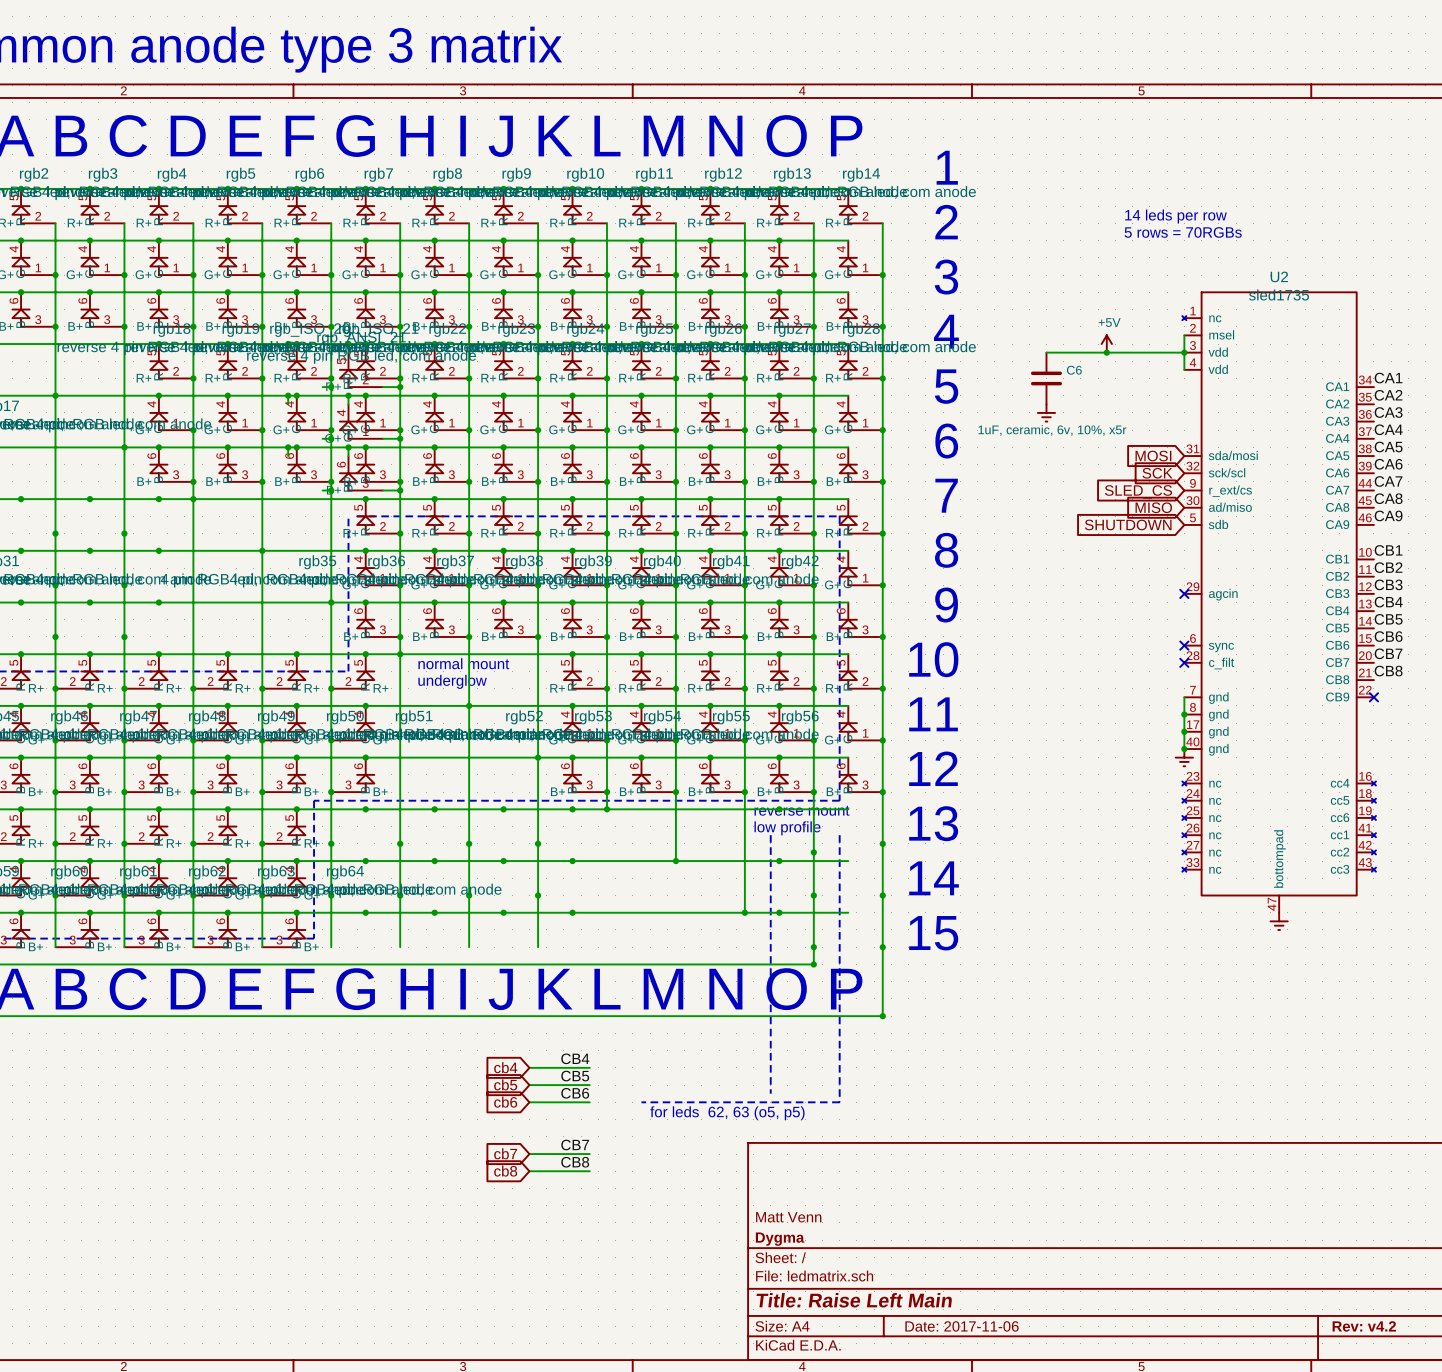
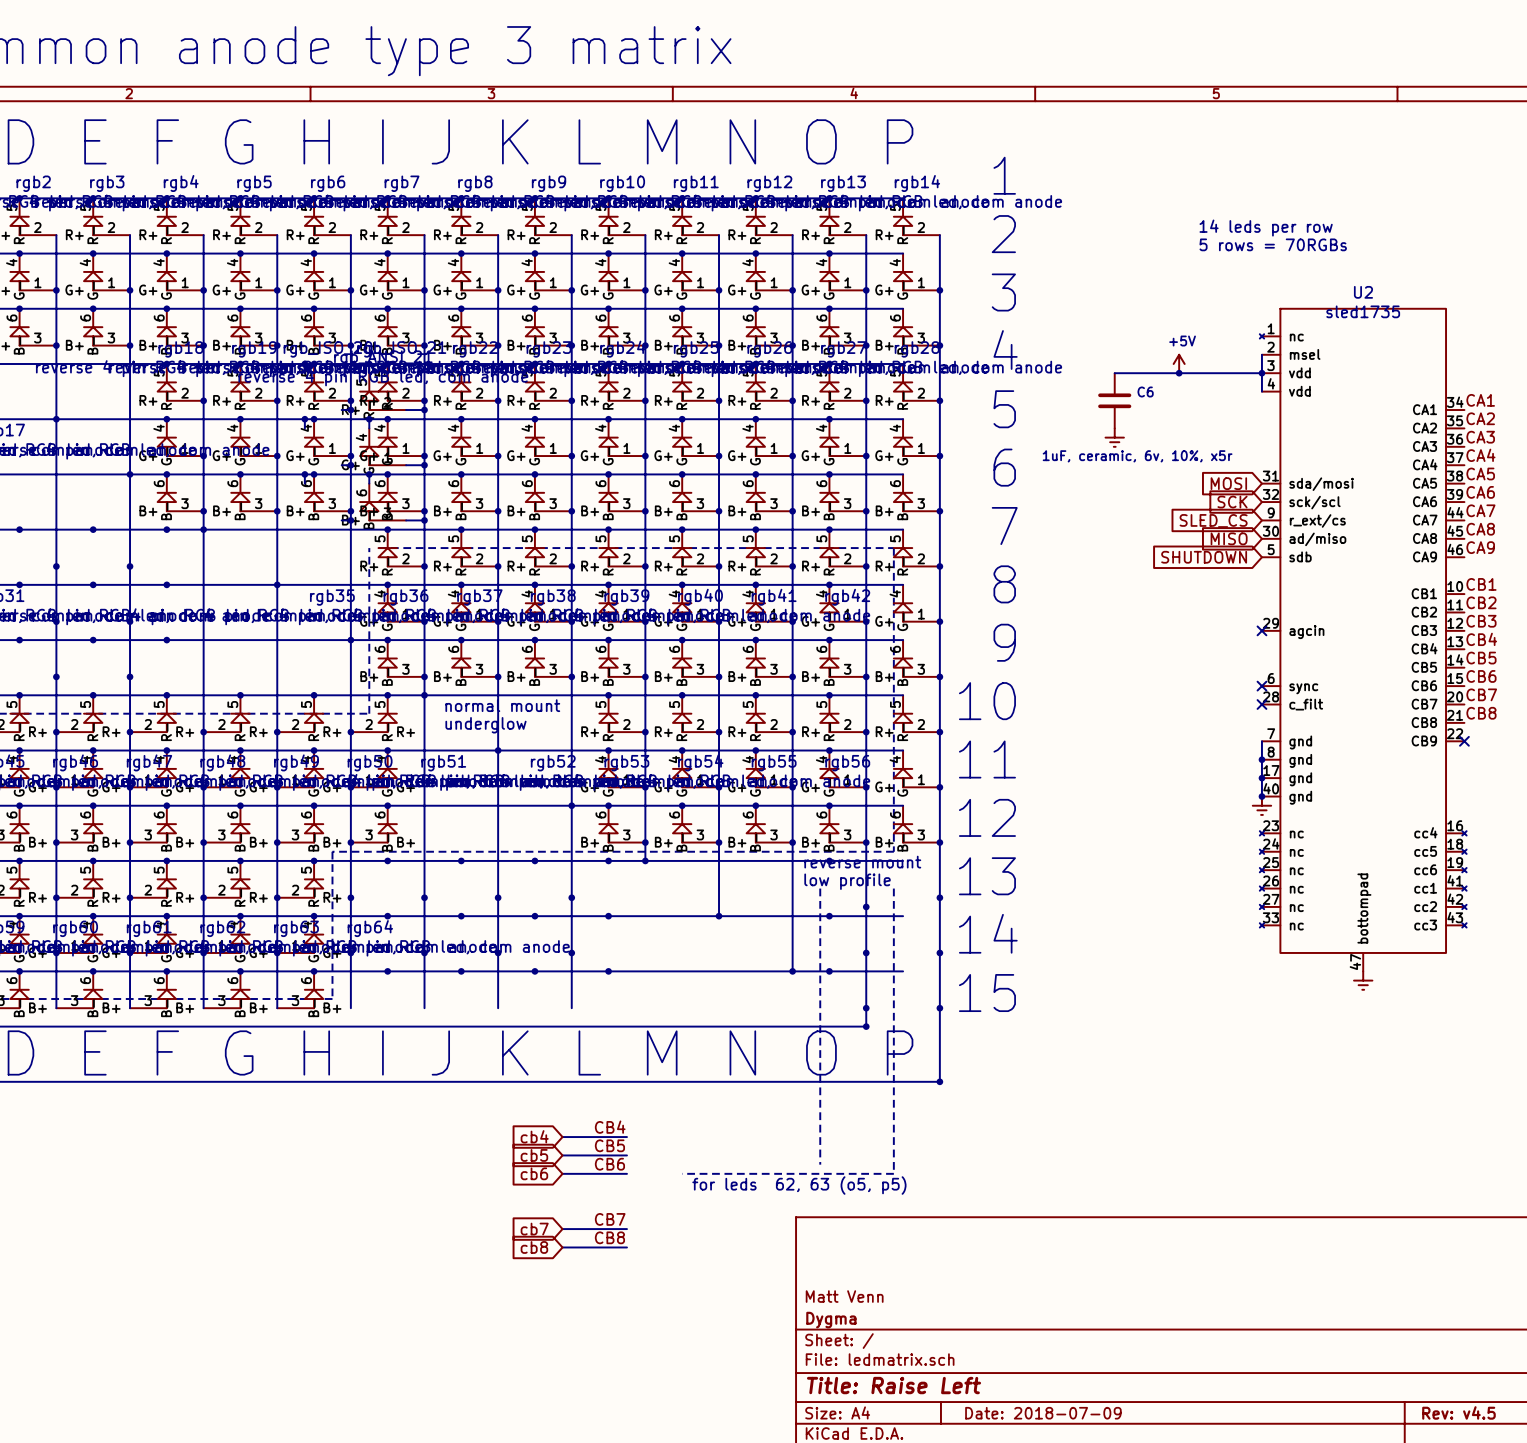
title block: Title: Raise Left Main (854, 1300) -> Title: Raise Left (894, 1385)
title block: Date: 2017-11-06 (962, 1326) -> Date: 2018-07-09 (1043, 1413)
title block: Rev: v4.2 (1364, 1326) -> Rev: v4.5 (1458, 1412)

